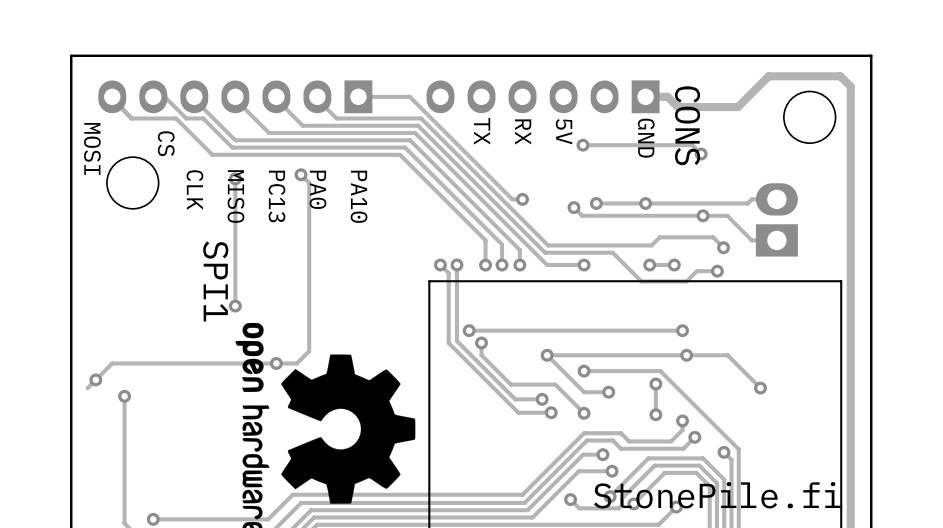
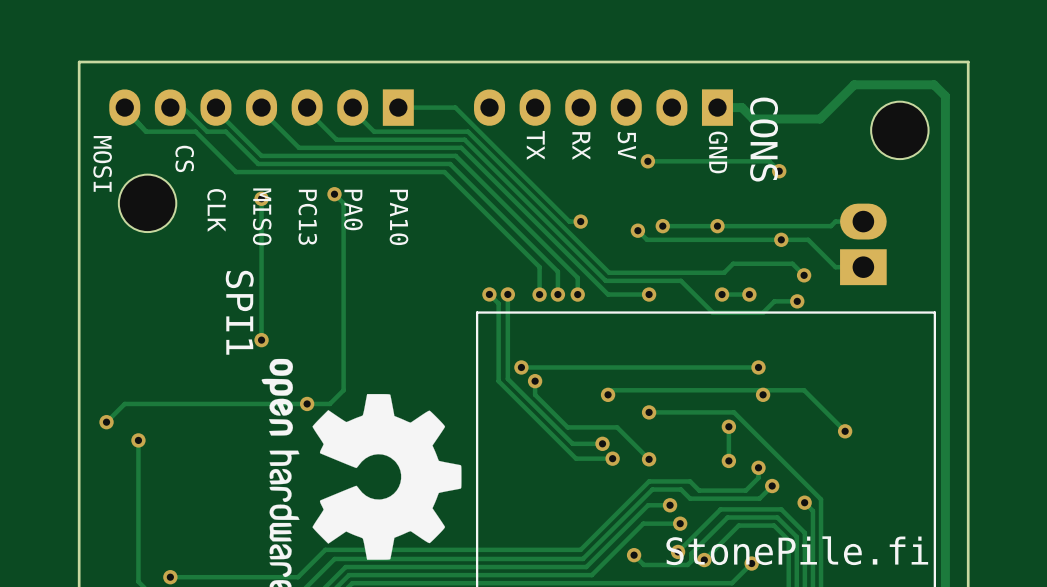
track: (727, 355) (547, 355) (584, 392) (608, 392) -> (808, 394) (804, 390) (608, 390) (603, 394)
track: (95, 379) (87, 388) -> none
via: (608, 392) -> none

